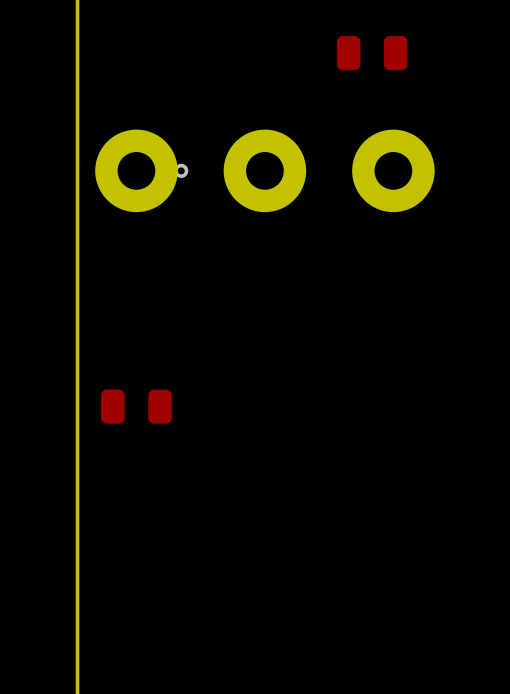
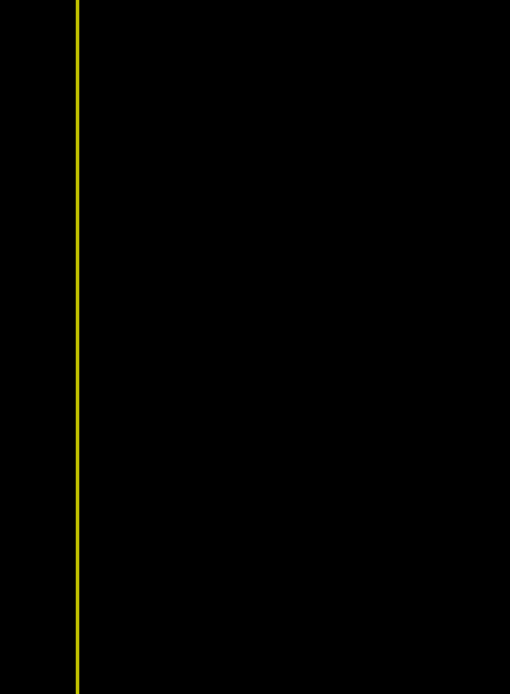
part: (372, 53) -> none
via: (181, 170) -> none
part: (264, 170) -> none
part: (136, 406) -> none

